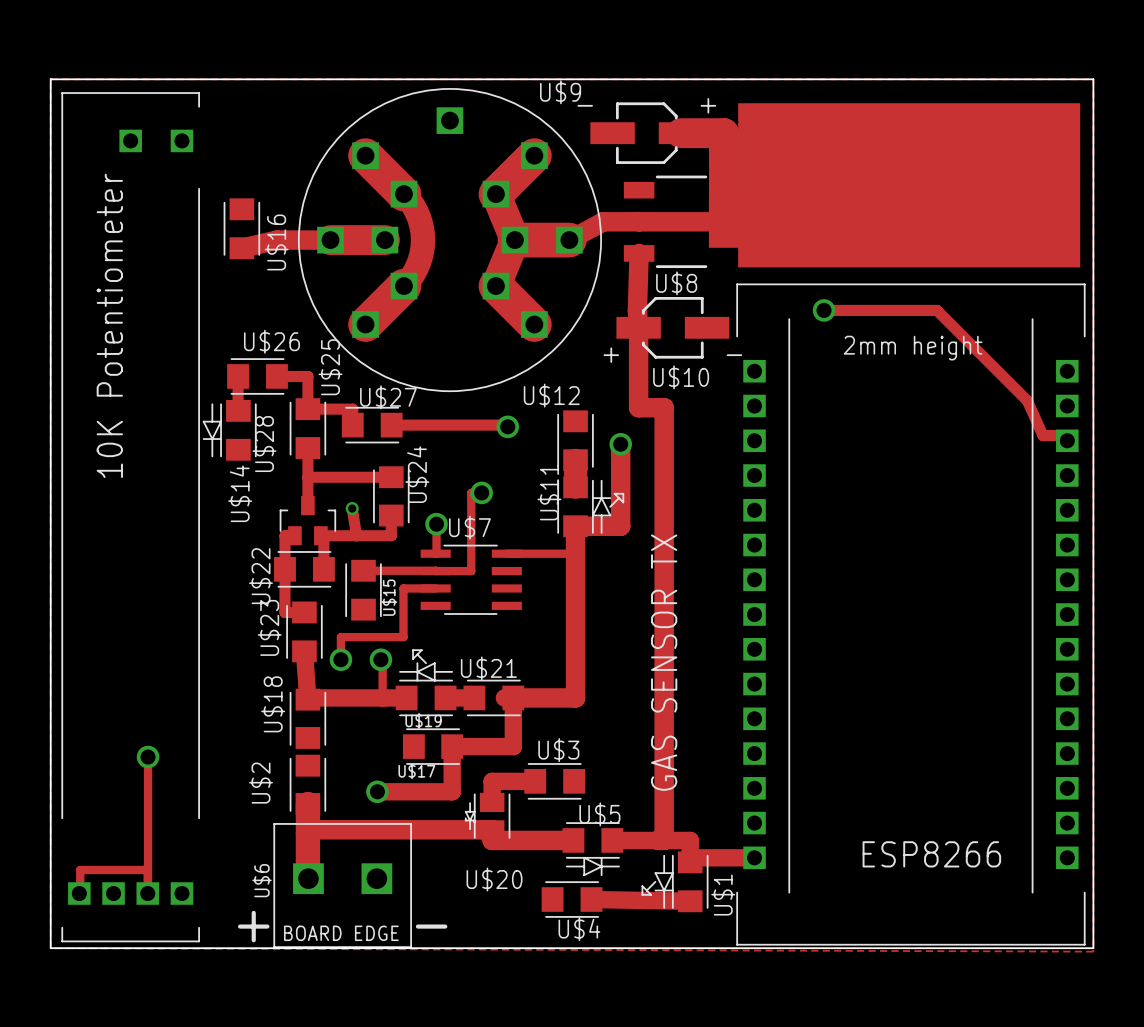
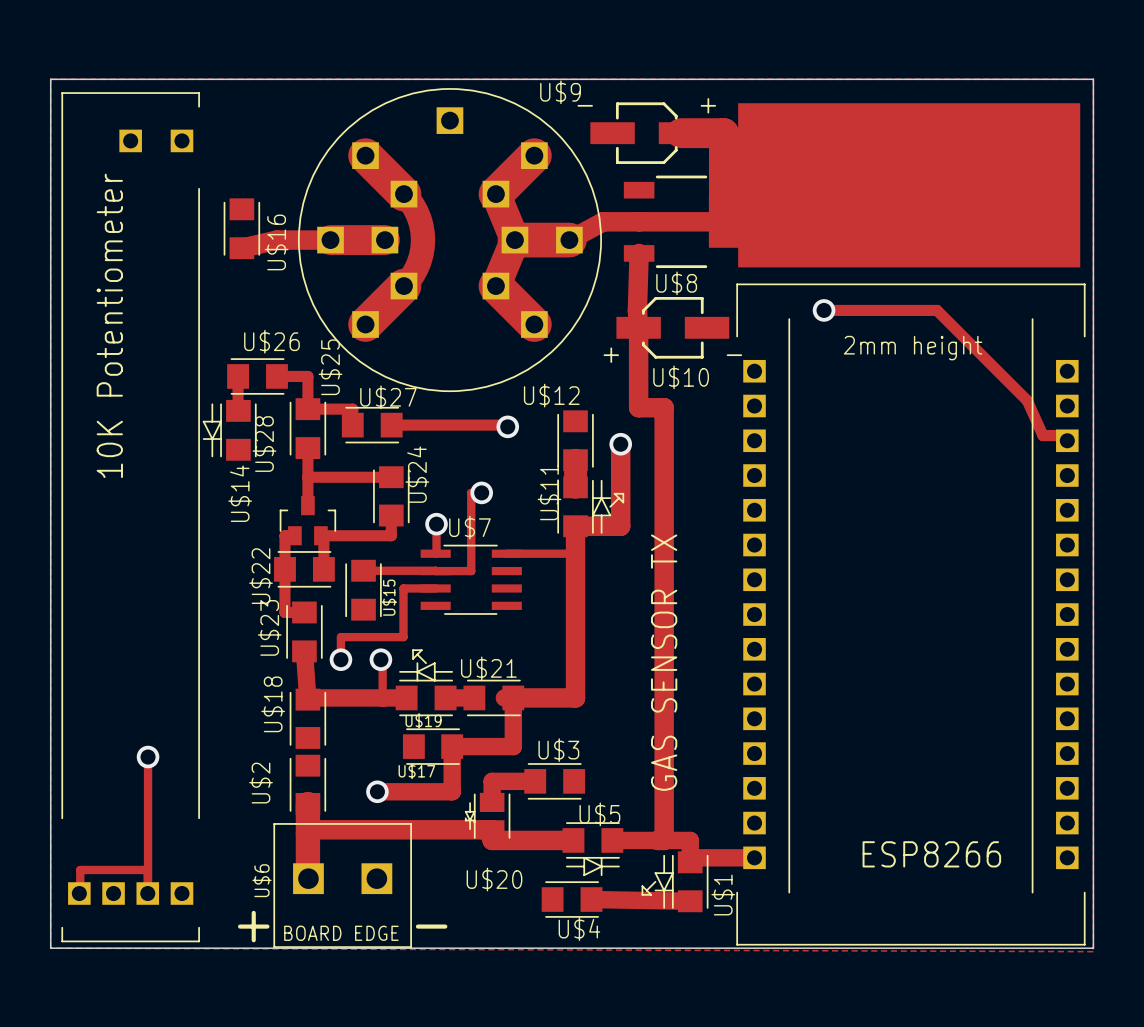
track: (352, 508) (356, 535) -> none
via: (352, 508) -> none

